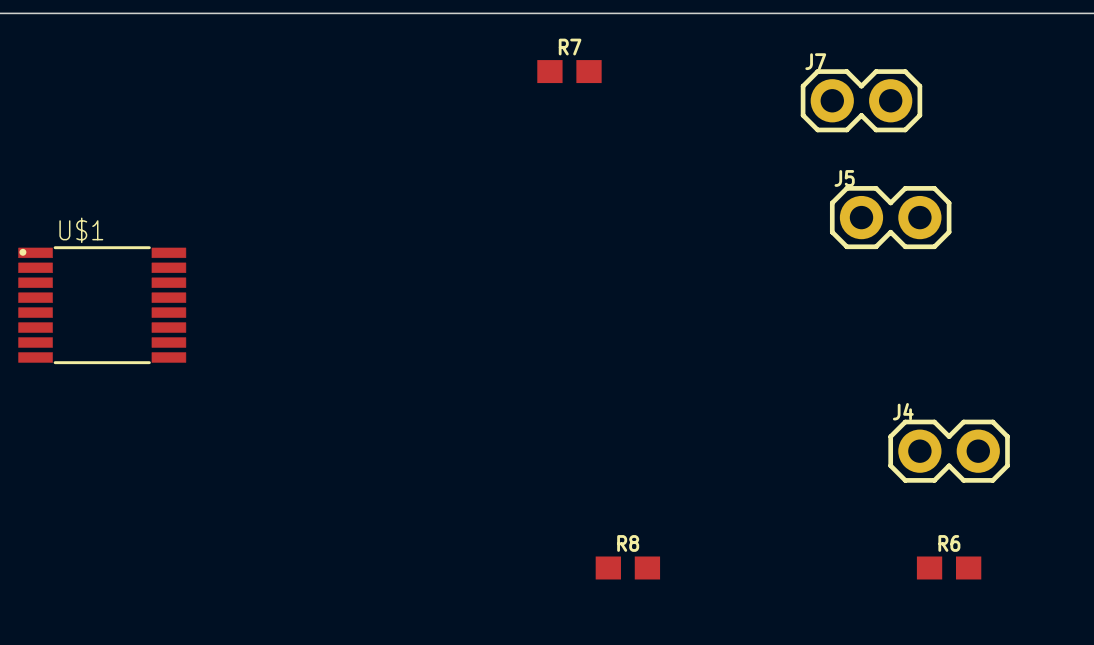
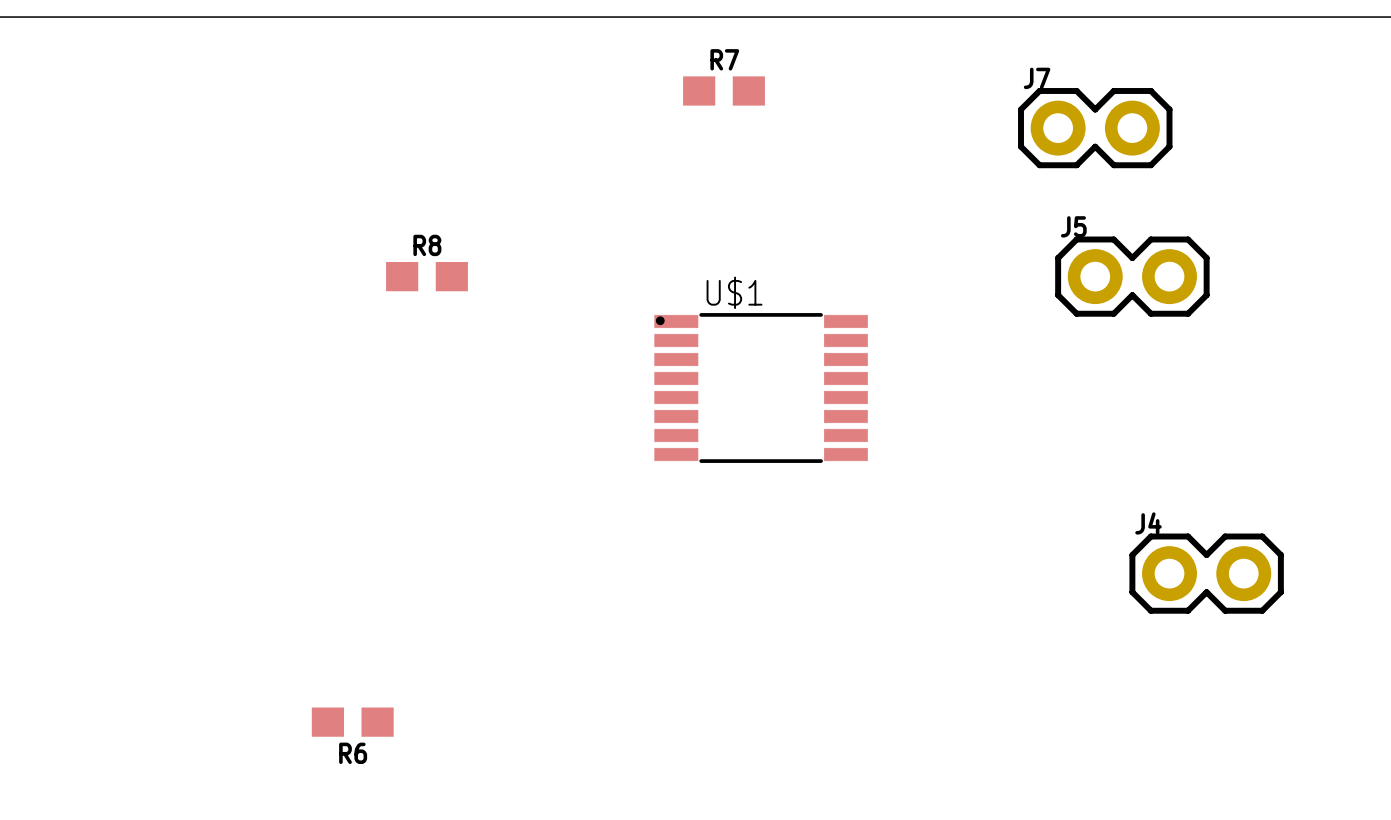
U$1 position: (102, 305) -> (761, 387)
R6 name position: R6 (949, 543) -> R6 (353, 753)
R8 position: (627, 567) -> (427, 276)
R6 position: (949, 567) -> (352, 722)

